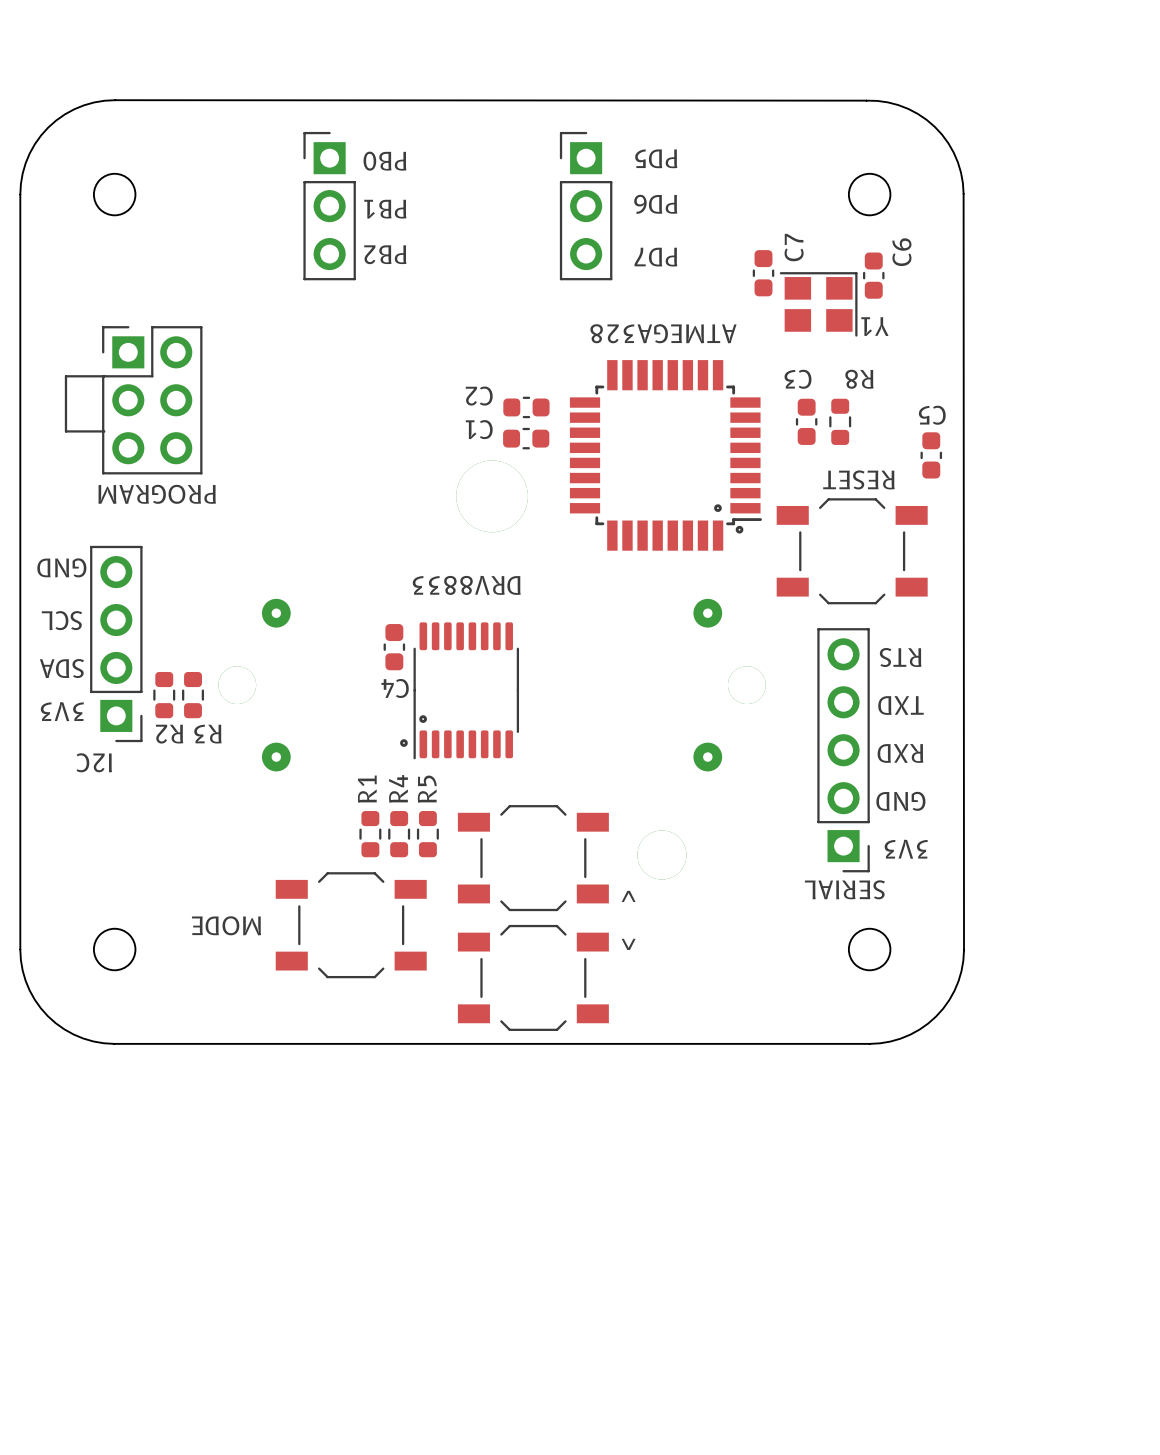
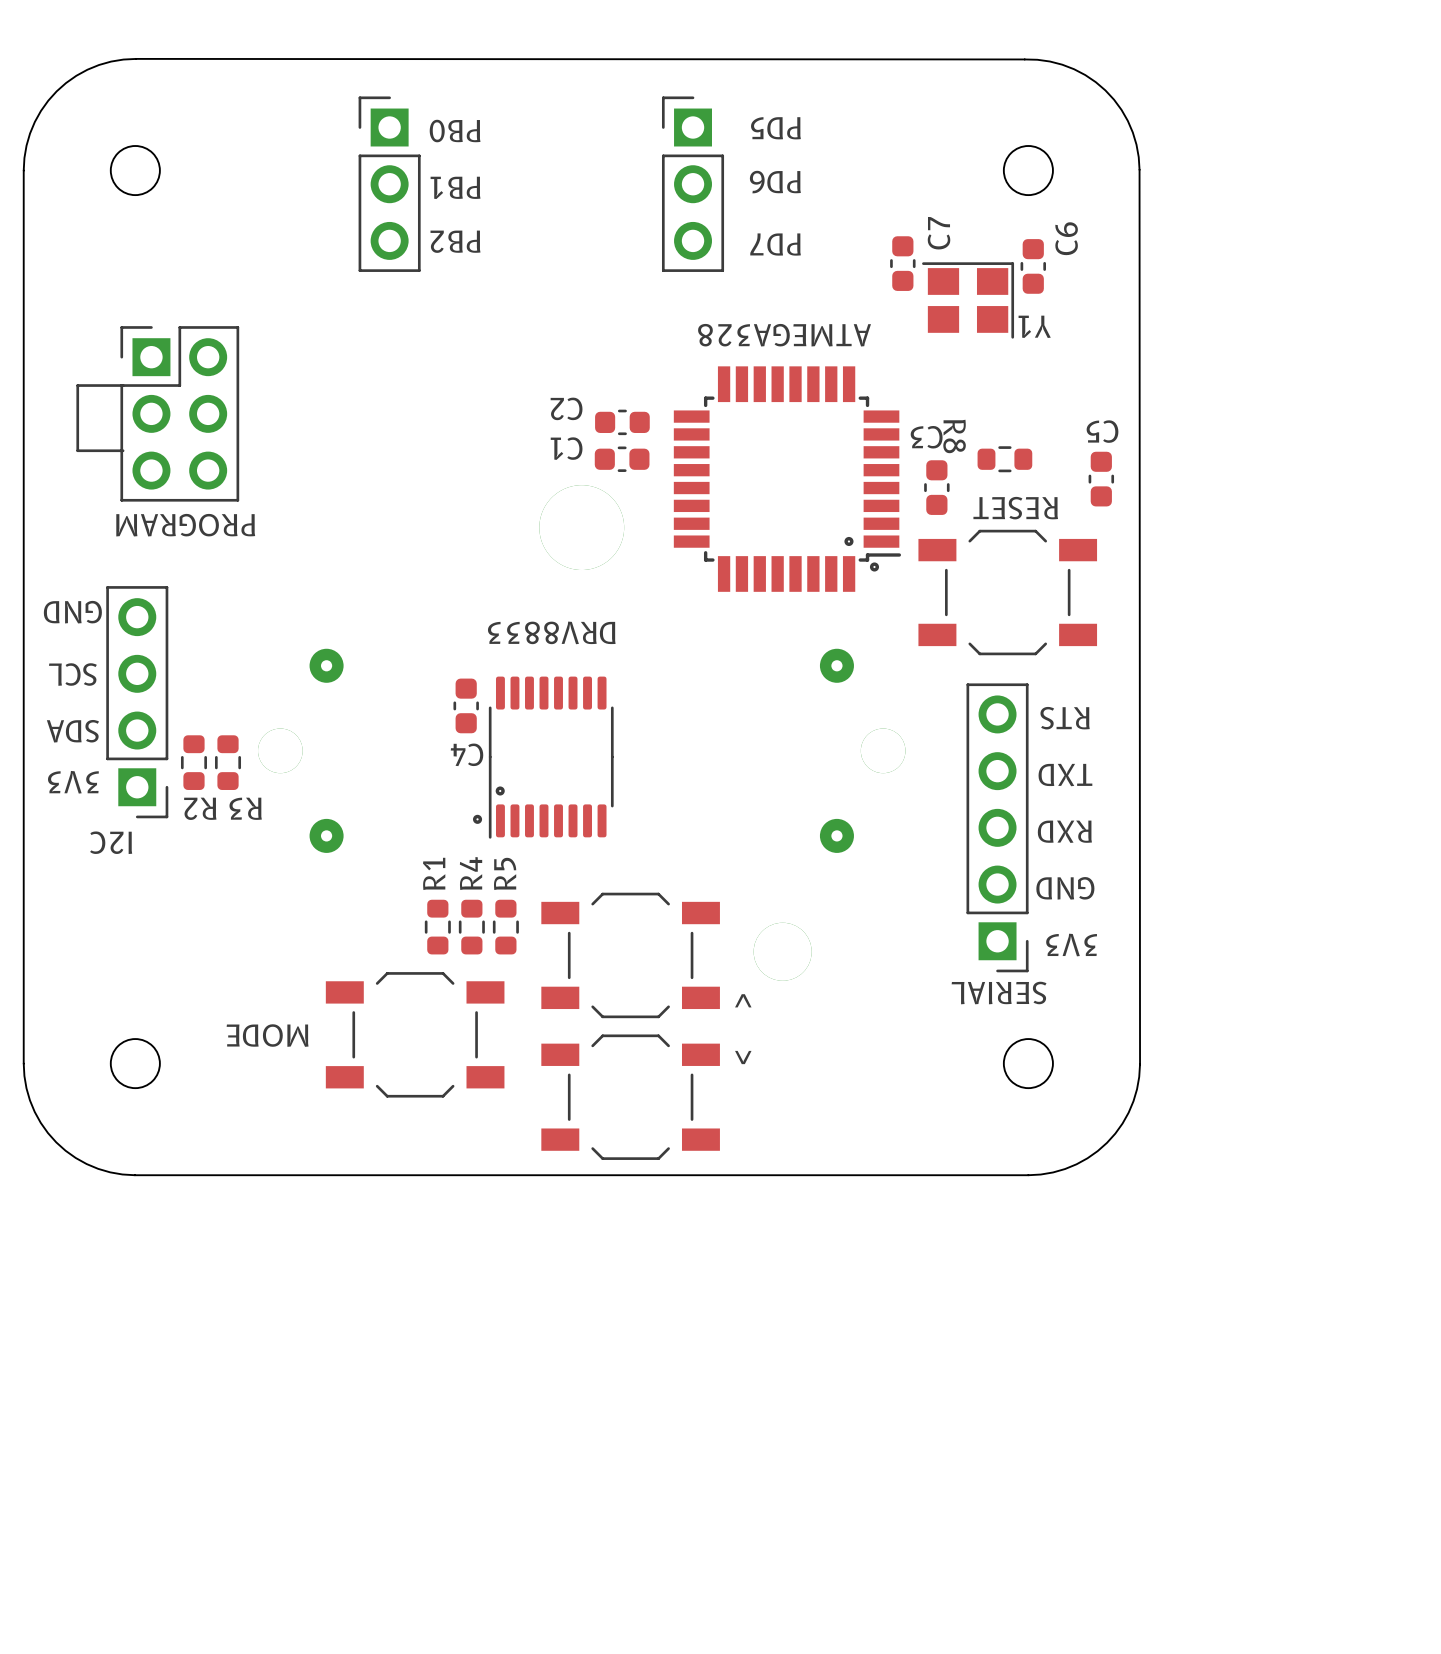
R8 name position: R8 (859, 379) -> R8 (954, 436)
C3 position: (806, 421) -> (936, 487)
R8 rotation: 0° (840, 421) -> 90° clockwise (1004, 459)

